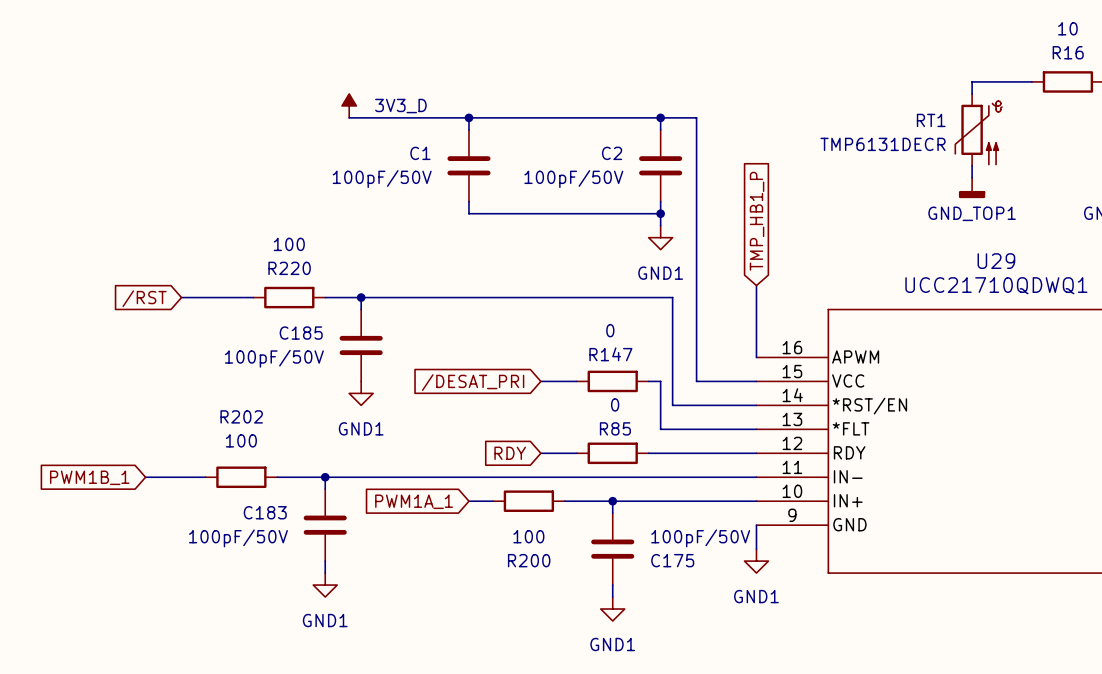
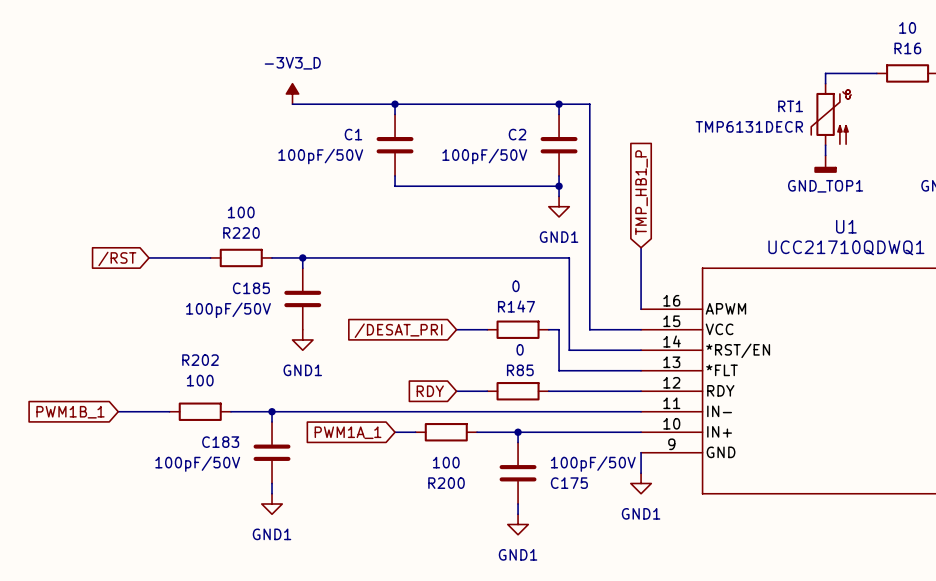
power symbol: 3V3_D (349, 105) -> -3V3_D (292, 93)
U29 name: U29 (996, 261) -> U1 (846, 226)

